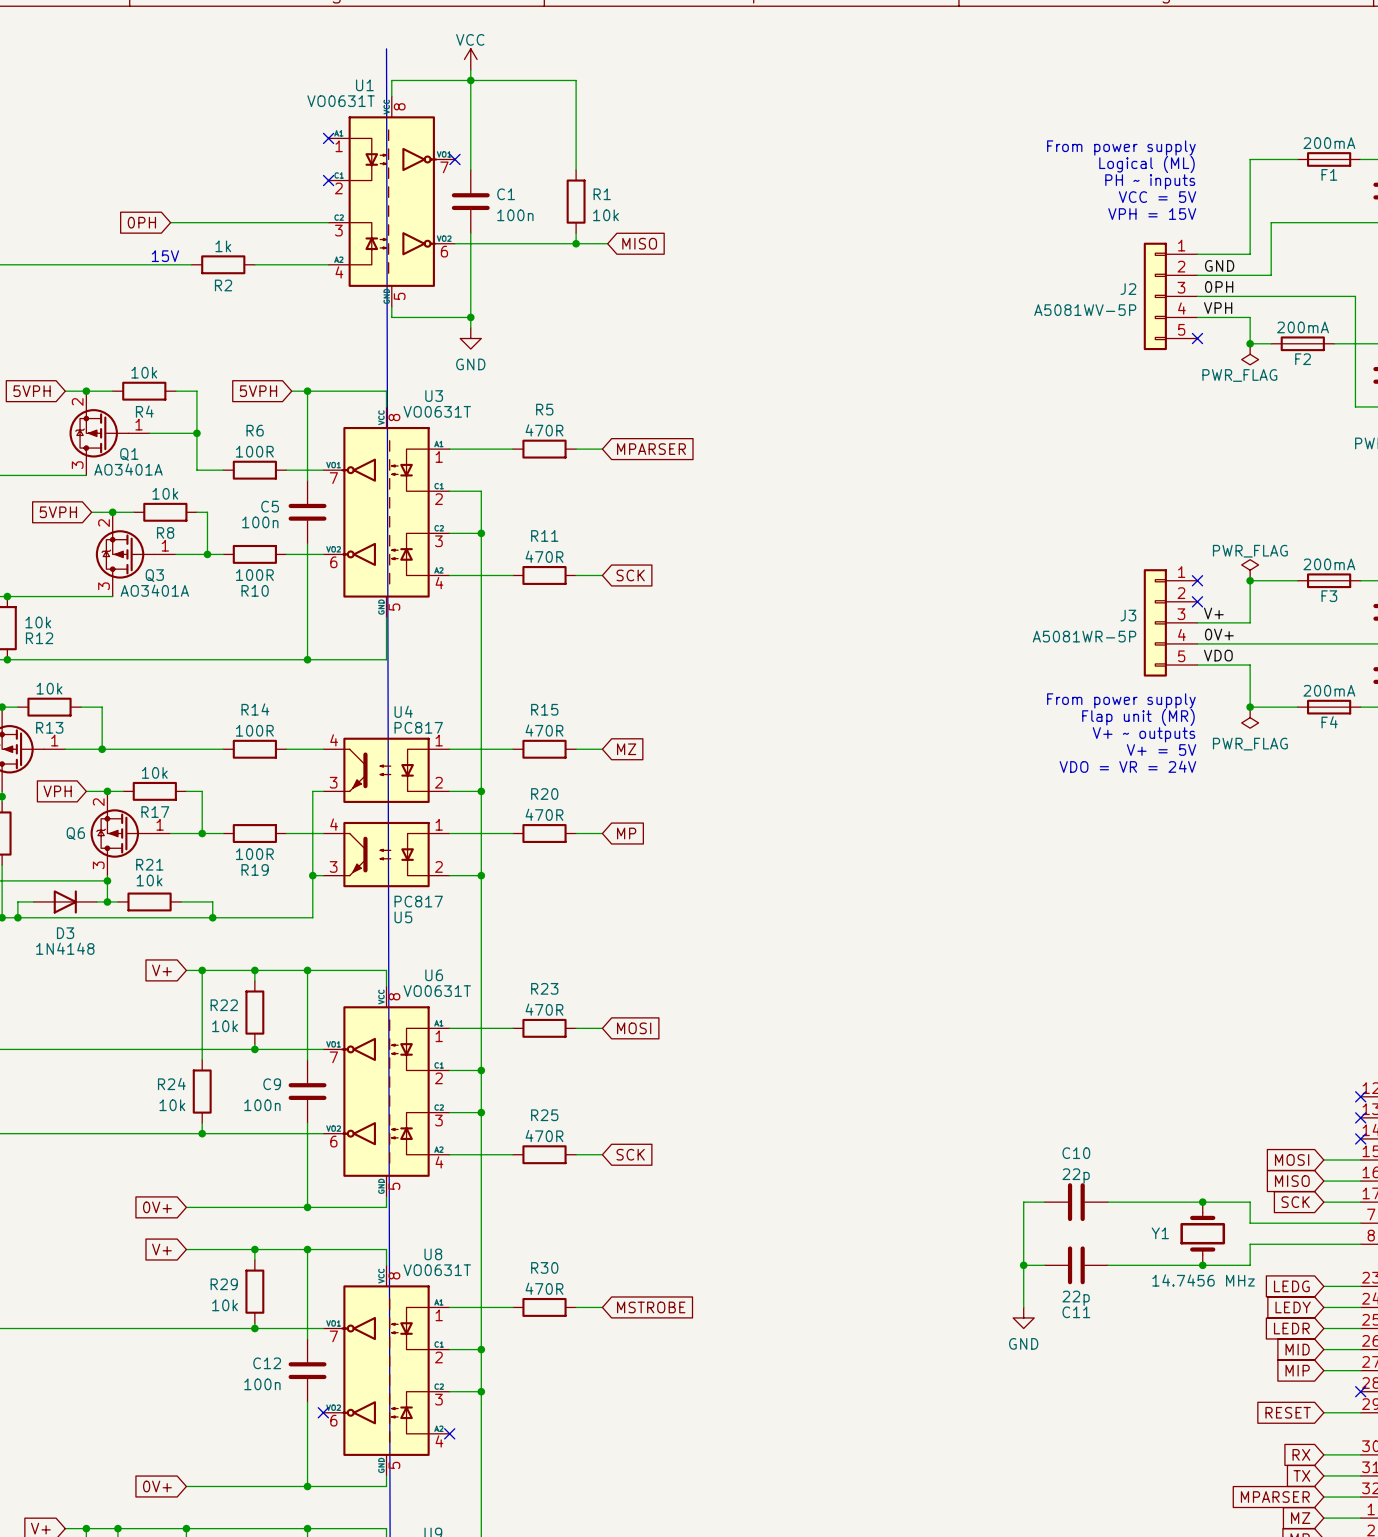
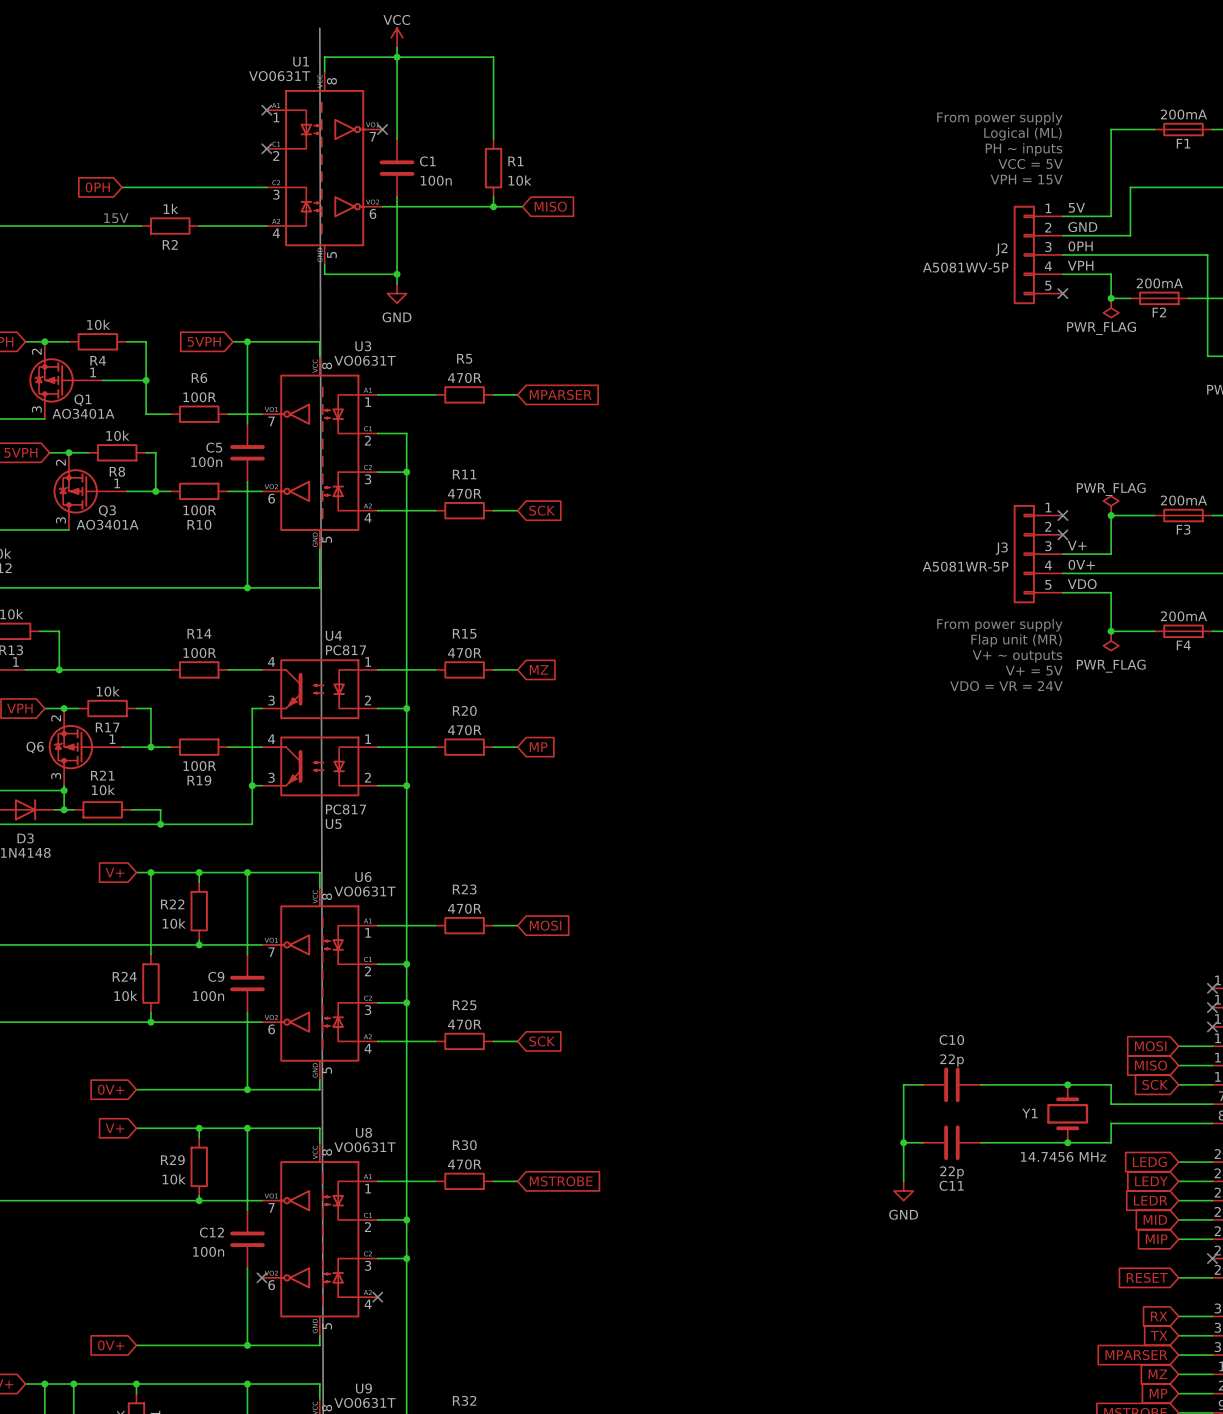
label: none -> 5V (1076, 207)

